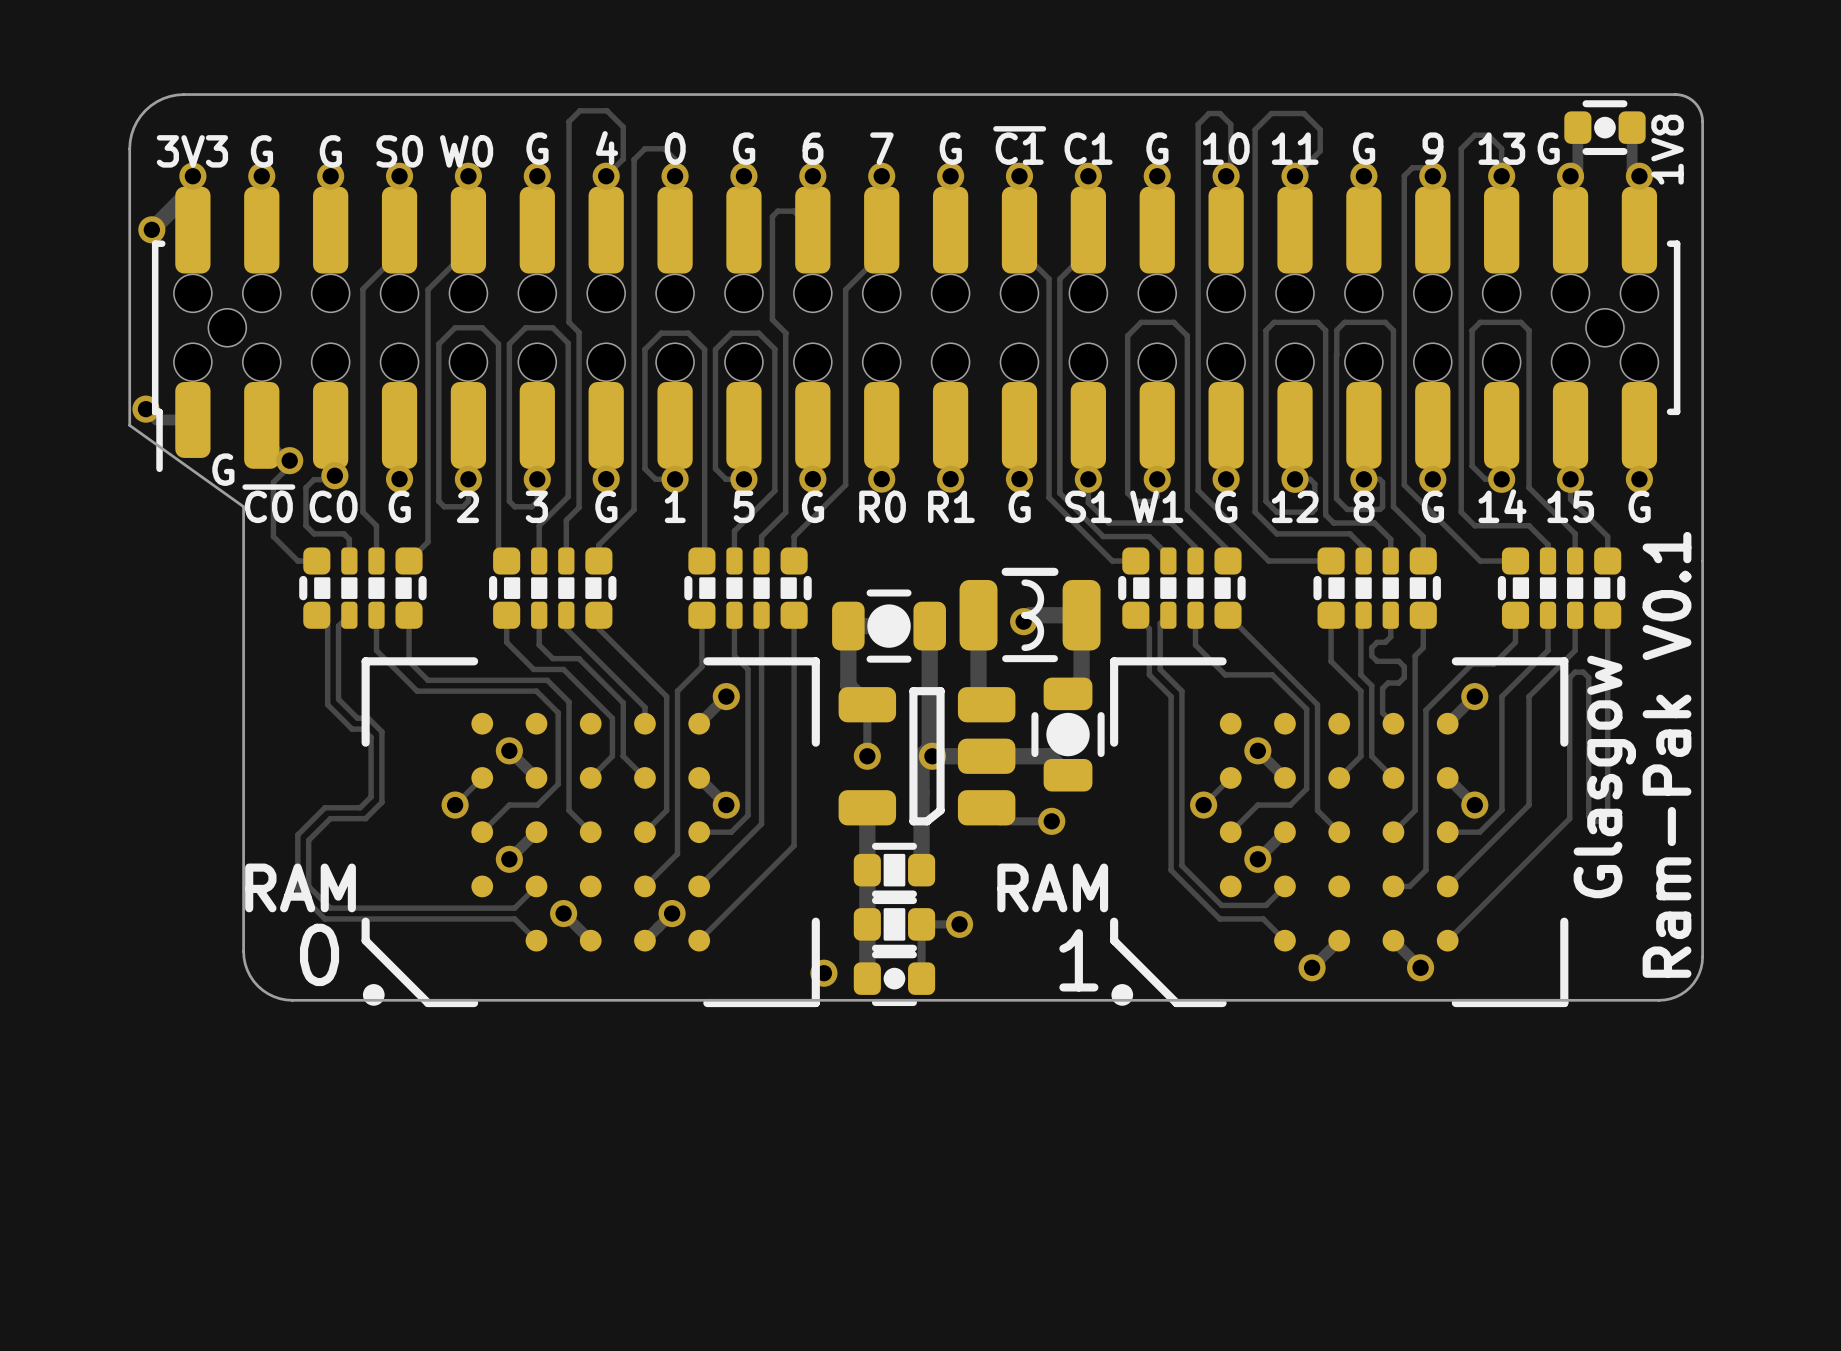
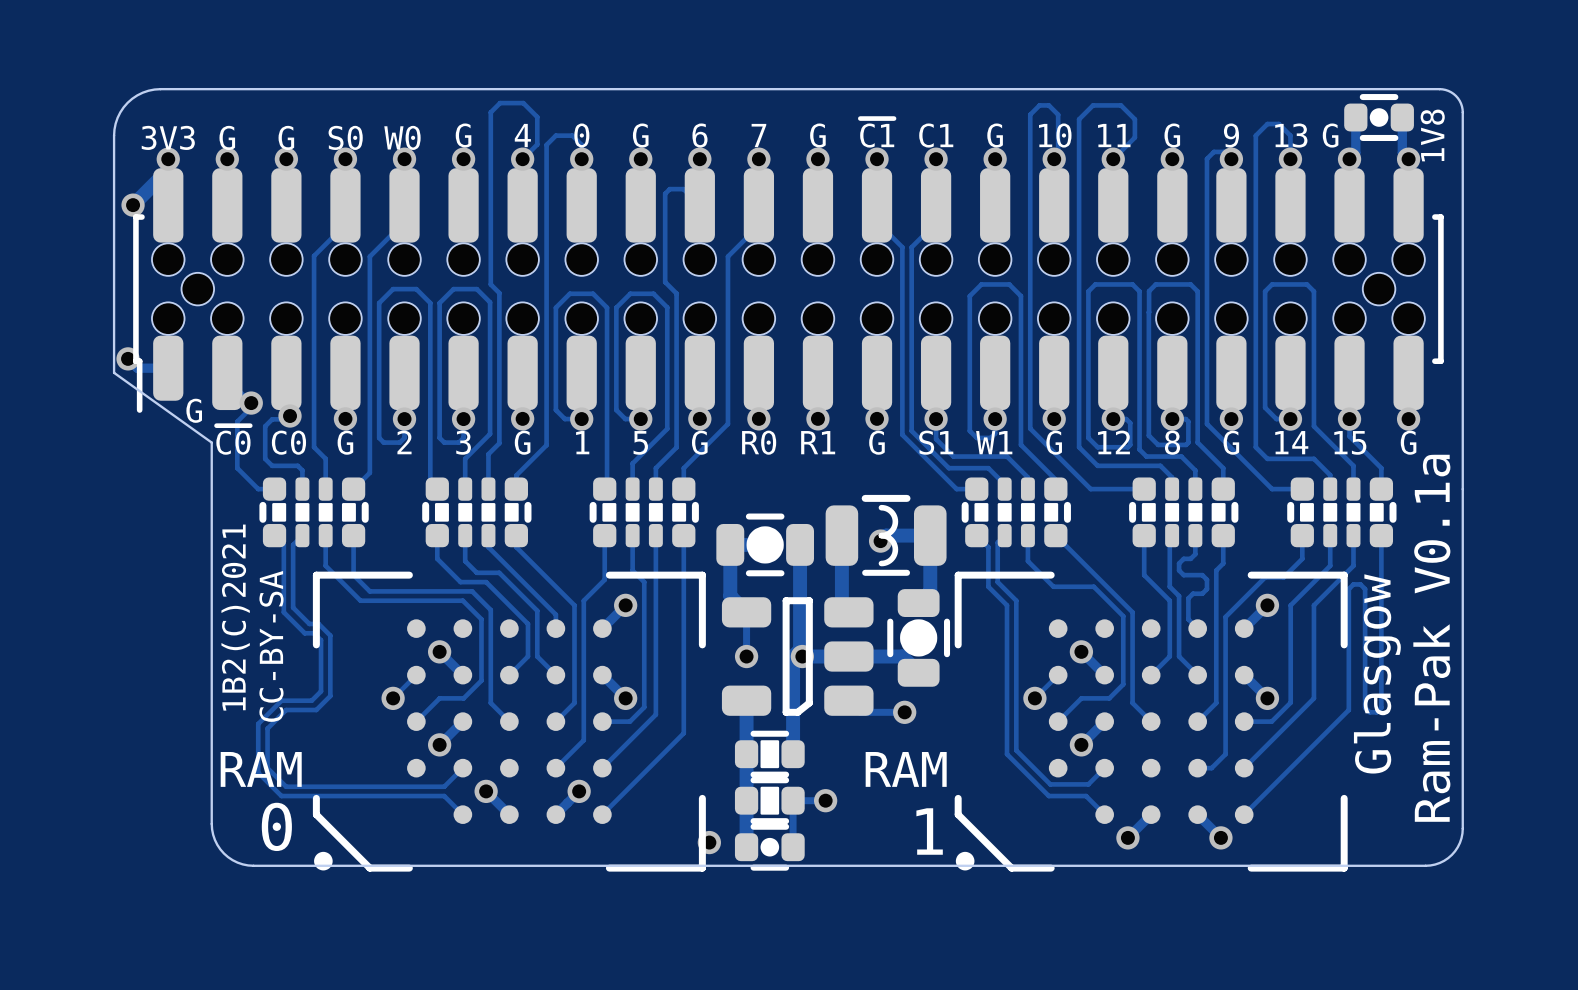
text: none -> 1B2(C)2021 (235, 617)
text: none -> CC-BY-SA (271, 646)
text: Ram-Pak V0.1 (1667, 754) -> Ram-Pak V0.1a (1431, 638)

